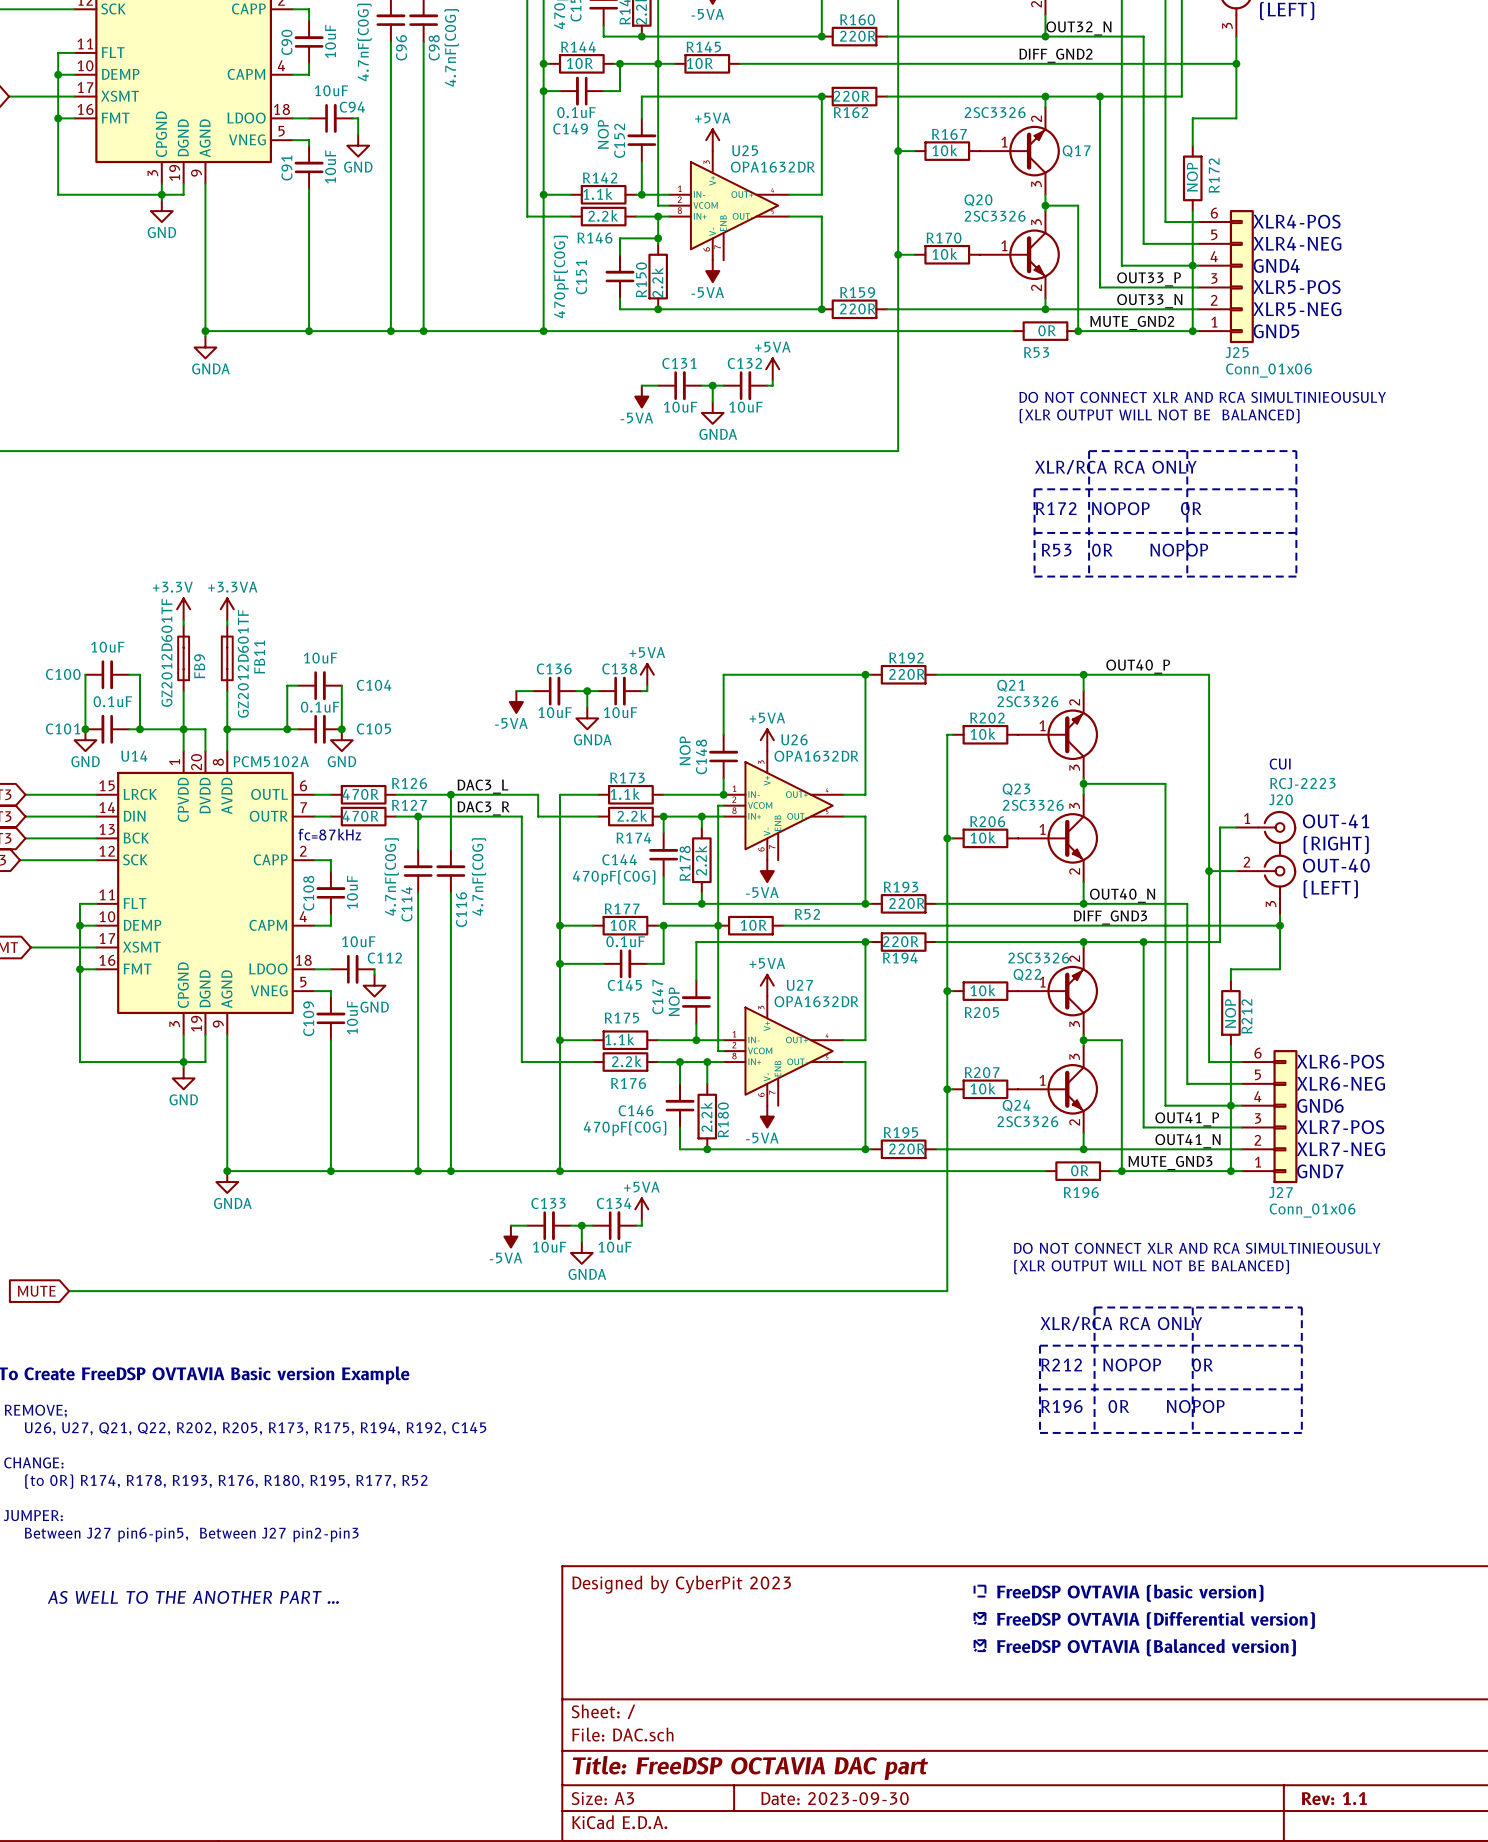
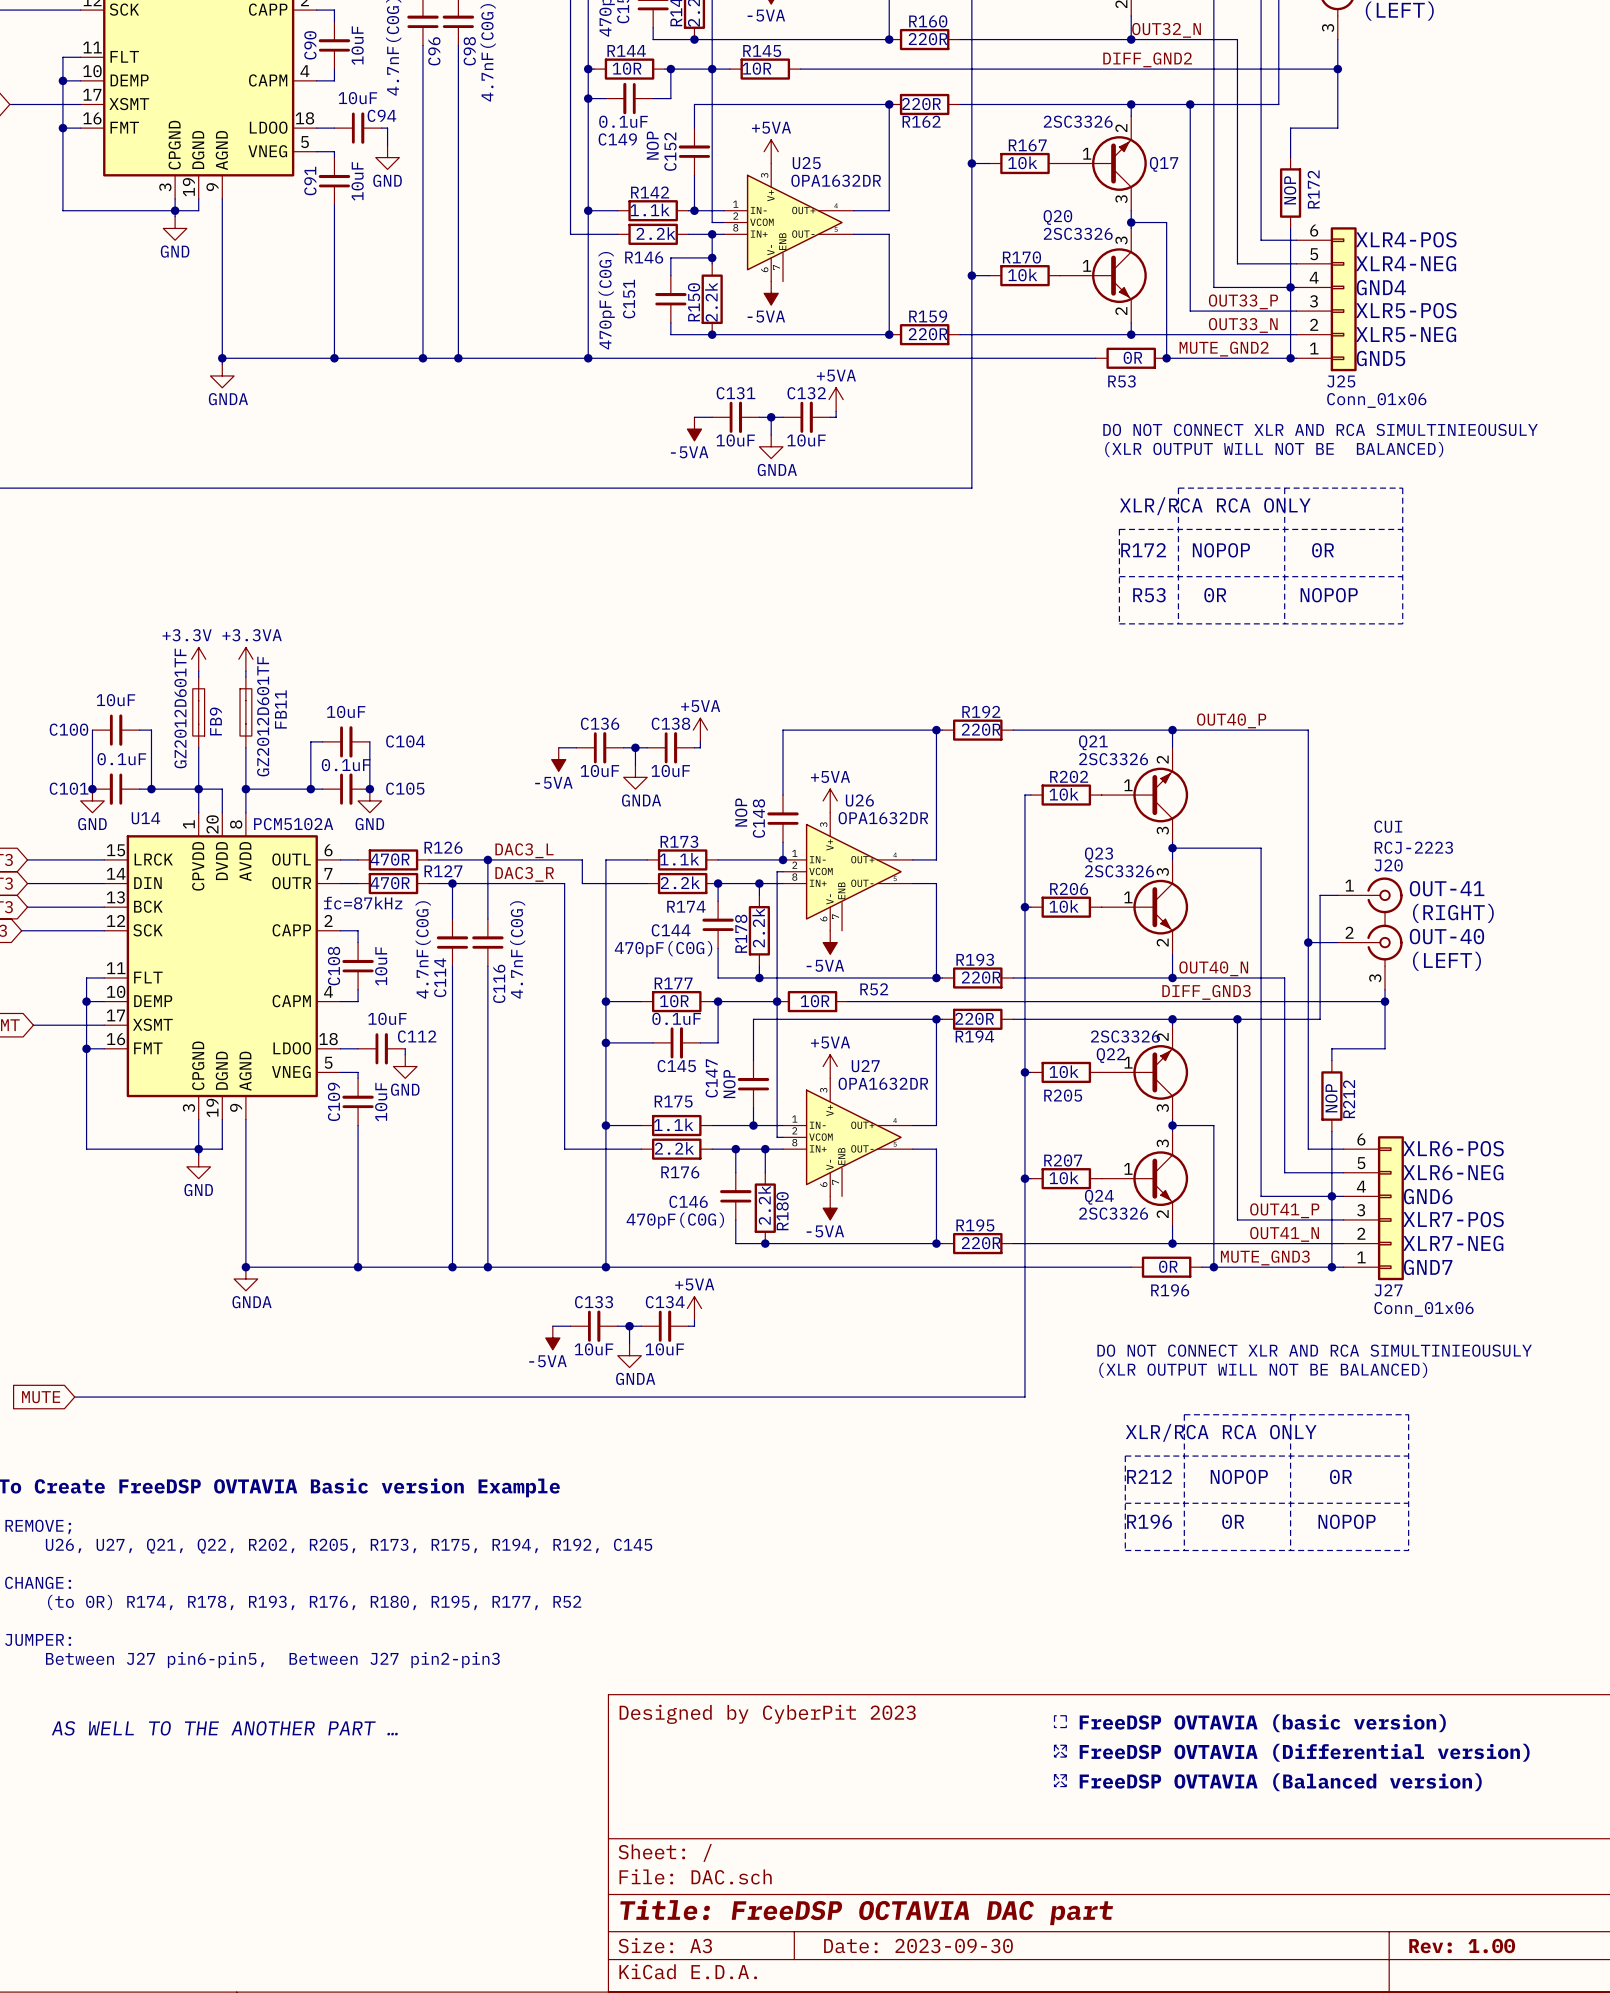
title block: Rev: 1.1 (1334, 1798) -> Rev: 1.00 (1462, 1946)

